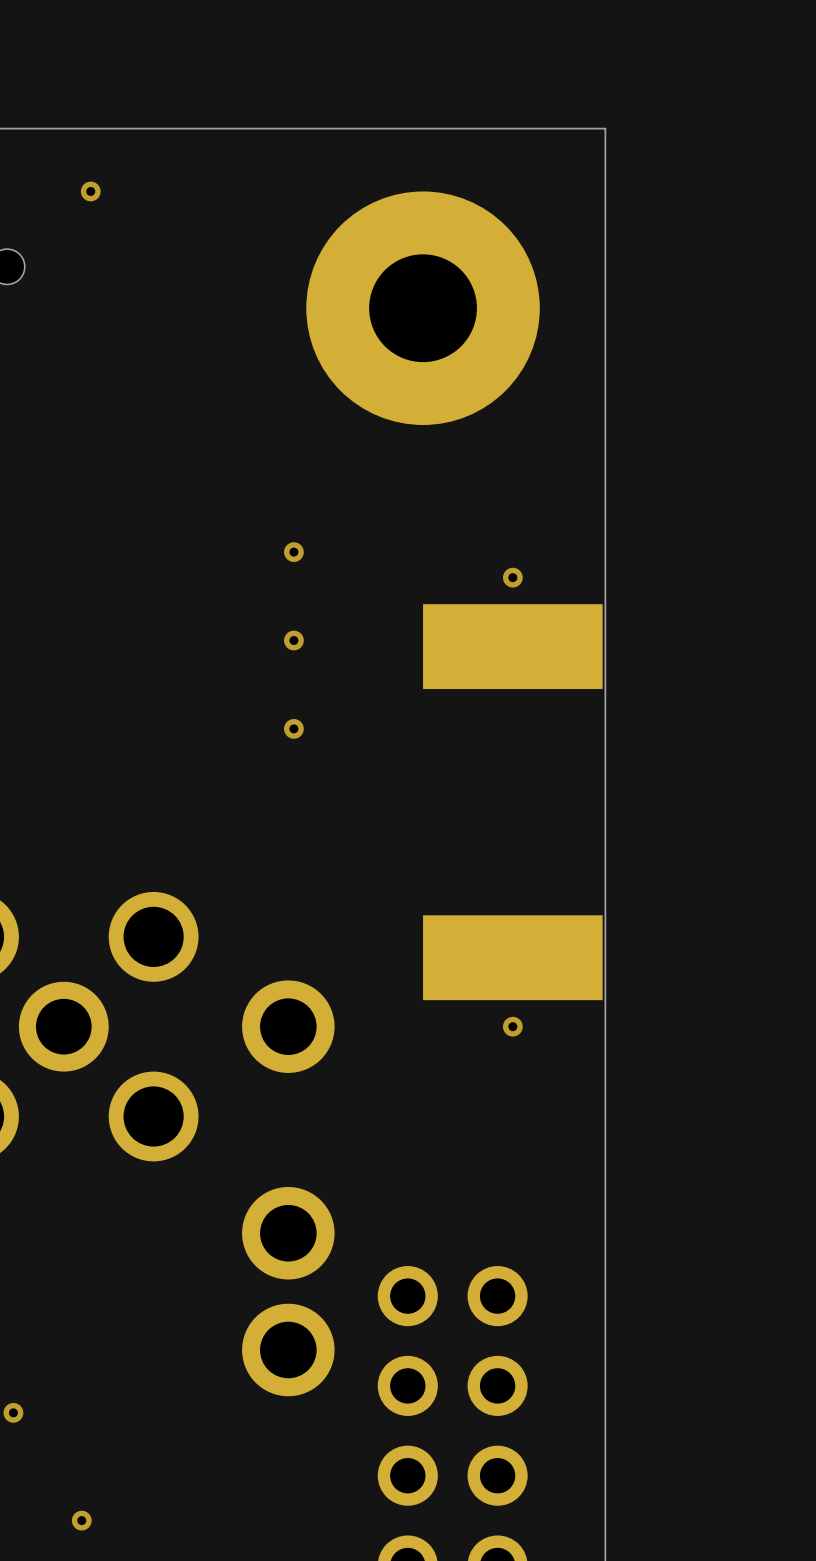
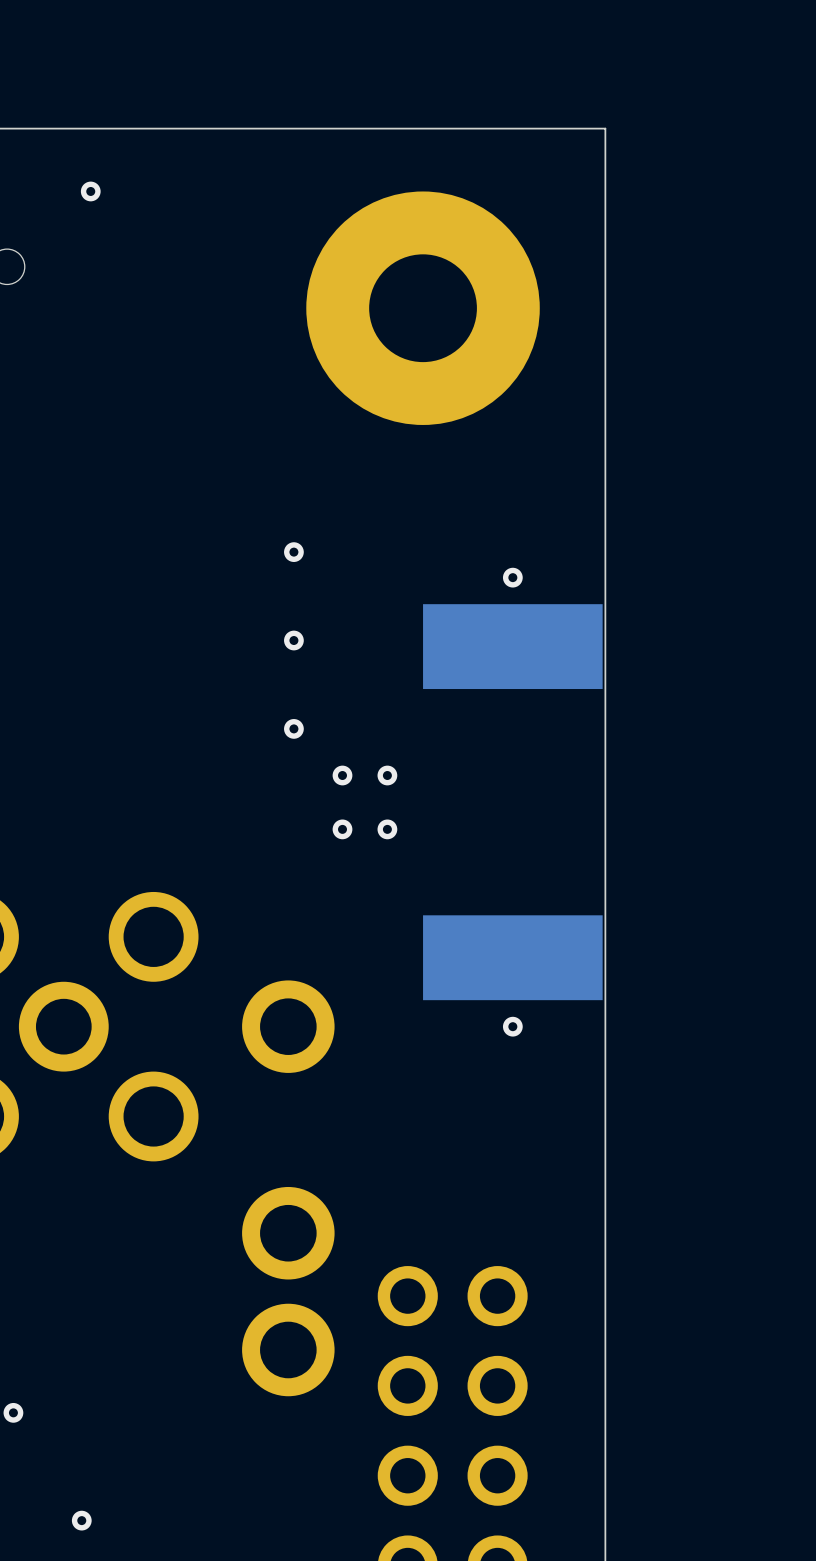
via: none -> (342, 775)
via: none -> (387, 775)
via: none -> (342, 829)
via: none -> (387, 829)

